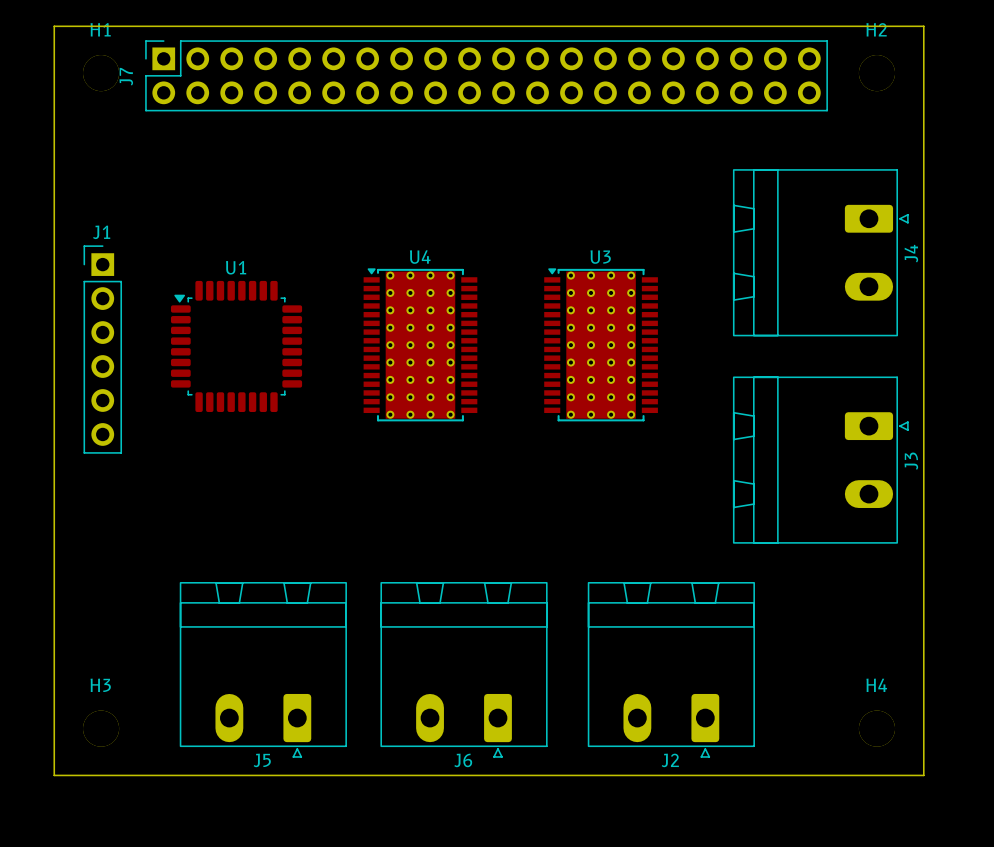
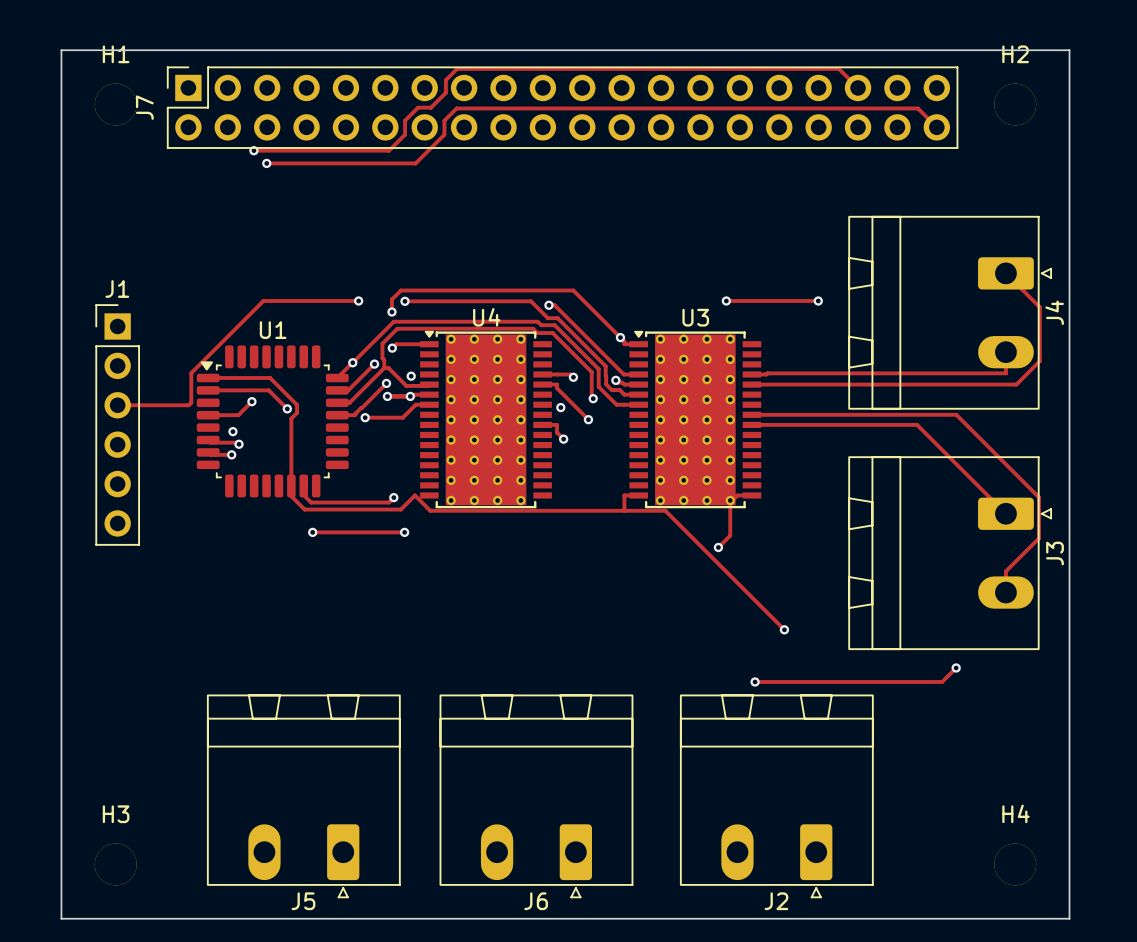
track: none -> (858, 87) (838, 68) (457, 68) (445, 80) (445, 92) (431, 107) (418, 107) (405, 120) (405, 134) (389, 150) (253, 150)
track: none -> (936, 127) (917, 108) (456, 108) (444, 120) (444, 134) (415, 163) (266, 163)
via: none -> (253, 150)
via: none -> (266, 163)
track: none -> (1005, 273) (1039, 307) (1039, 361) (1016, 384) (751, 384)
track: none -> (358, 300) (263, 300) (191, 373) (191, 402) (188, 405) (117, 405)
via: none -> (358, 300)
track: none -> (404, 301) (531, 301) (547, 318) (557, 318) (605, 366) (606, 384) (611, 390) (619, 390) (624, 394) (638, 394)
via: none -> (404, 301)
track: none -> (726, 300) (818, 300)
via: none -> (726, 300)
via: none -> (818, 300)
track: none -> (548, 305) (554, 305) (623, 374) (638, 374)
via: none -> (548, 305)
via: none -> (391, 312)
track: none -> (391, 313) (391, 299) (400, 290) (573, 290) (624, 341) (624, 344) (638, 344)
via: none -> (620, 337)
track: none -> (429, 344) (396, 344) (392, 348)
via: none -> (392, 348)
track: none -> (1005, 352) (1005, 373) (751, 374)
track: none -> (352, 362) (337, 377)
track: none -> (352, 362) (393, 321) (537, 321) (541, 325) (554, 325) (598, 369) (598, 386) (616, 404) (638, 404)
via: none -> (352, 362)
track: none -> (374, 364) (348, 390) (337, 390)
via: none -> (374, 364)
track: none -> (384, 368) (382, 343) (397, 328) (533, 328) (537, 333) (552, 333) (591, 372) (593, 398)
track: none -> (384, 368) (349, 402) (337, 402)
track: none -> (384, 368) (388, 368) (406, 385) (429, 384)
track: none -> (542, 374) (570, 374) (573, 377)
via: none -> (411, 376)
via: none -> (573, 377)
track: none -> (208, 377) (270, 377) (297, 404) (297, 412) (291, 418) (291, 496) (304, 509) (400, 509) (415, 495) (430, 510) (665, 510) (784, 629)
track: none -> (615, 380) (624, 384) (638, 384)
via: none -> (615, 380)
track: none -> (386, 383) (354, 415) (337, 415)
via: none -> (386, 383)
track: none -> (542, 384) (556, 384) (556, 388) (588, 419)
track: none -> (208, 390) (268, 390) (287, 408)
track: none -> (429, 394) (387, 396)
via: none -> (387, 396)
via: none -> (410, 396)
via: none -> (593, 398)
track: none -> (251, 401) (238, 415) (208, 415)
via: none -> (251, 401)
track: none -> (429, 404) (415, 404) (402, 417) (365, 417)
via: none -> (560, 407)
via: none -> (287, 408)
track: none -> (751, 414) (956, 414) (1039, 497) (1039, 538) (1005, 571) (1005, 592)
via: none -> (365, 417)
via: none -> (588, 419)
track: none -> (542, 424) (556, 424) (556, 432) (563, 439)
track: none -> (751, 424) (917, 424) (1005, 513)
via: none -> (232, 431)
via: none -> (563, 439)
track: none -> (208, 440) (210, 442) (237, 442) (239, 444)
via: none -> (239, 444)
track: none -> (208, 452) (210, 454) (231, 454)
via: none -> (231, 454)
track: none -> (303, 485) (303, 495) (311, 502) (388, 502) (393, 497)
track: none -> (638, 495) (624, 495) (624, 510)
track: none -> (751, 495) (737, 495) (730, 500) (730, 535) (718, 547)
via: none -> (393, 497)
track: none -> (312, 532) (404, 532)
via: none -> (312, 532)
via: none -> (404, 532)
via: none -> (718, 547)
via: none -> (784, 629)
track: none -> (956, 667) (942, 681) (755, 681)
via: none -> (956, 667)
via: none -> (755, 681)

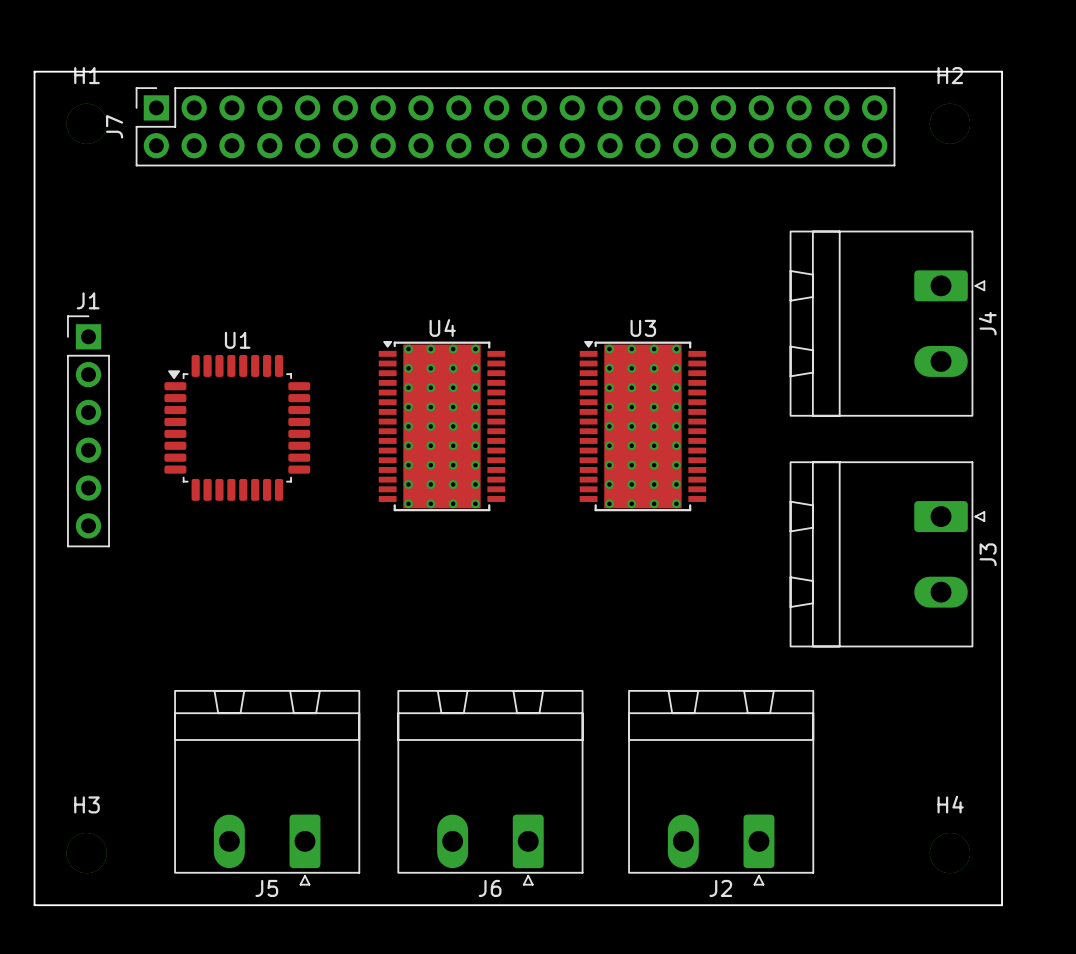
track: (858, 87) (838, 68) (457, 68) (445, 80) (445, 92) (431, 107) (418, 107) (405, 120) (405, 134) (389, 150) (253, 150) -> none
track: (936, 127) (917, 108) (456, 108) (444, 120) (444, 134) (415, 163) (266, 163) -> none
via: (253, 150) -> none
via: (266, 163) -> none
track: (1005, 273) (1039, 307) (1039, 361) (1016, 384) (751, 384) -> none
track: (358, 300) (263, 300) (191, 373) (191, 402) (188, 405) (117, 405) -> none
via: (358, 300) -> none
track: (726, 300) (818, 300) -> none
via: (726, 300) -> none
via: (818, 300) -> none
track: (404, 301) (531, 301) (547, 318) (557, 318) (605, 366) (606, 384) (611, 390) (619, 390) (624, 394) (638, 394) -> none
via: (404, 301) -> none
track: (548, 305) (554, 305) (623, 374) (638, 374) -> none
via: (548, 305) -> none
via: (391, 312) -> none
track: (391, 313) (391, 299) (400, 290) (573, 290) (624, 341) (624, 344) (638, 344) -> none
via: (620, 337) -> none
track: (429, 344) (396, 344) (392, 348) -> none
via: (392, 348) -> none
track: (1005, 352) (1005, 373) (751, 374) -> none
track: (352, 362) (337, 377) -> none
track: (352, 362) (393, 321) (537, 321) (541, 325) (554, 325) (598, 369) (598, 386) (616, 404) (638, 404) -> none
via: (352, 362) -> none
track: (374, 364) (348, 390) (337, 390) -> none
via: (374, 364) -> none
track: (384, 368) (382, 343) (397, 328) (533, 328) (537, 333) (552, 333) (591, 372) (593, 398) -> none
track: (384, 368) (349, 402) (337, 402) -> none
track: (384, 368) (388, 368) (406, 385) (429, 384) -> none
track: (542, 374) (570, 374) (573, 377) -> none
via: (411, 376) -> none
track: (208, 377) (270, 377) (297, 404) (297, 412) (291, 418) (291, 496) (304, 509) (400, 509) (415, 495) (430, 510) (665, 510) (784, 629) -> none
via: (573, 377) -> none
track: (615, 380) (624, 384) (638, 384) -> none
via: (615, 380) -> none
track: (386, 383) (354, 415) (337, 415) -> none
via: (386, 383) -> none
track: (542, 384) (556, 384) (556, 388) (588, 419) -> none
track: (208, 390) (268, 390) (287, 408) -> none
track: (429, 394) (387, 396) -> none
via: (387, 396) -> none
via: (410, 396) -> none
via: (593, 398) -> none
track: (251, 401) (238, 415) (208, 415) -> none
via: (251, 401) -> none
track: (429, 404) (415, 404) (402, 417) (365, 417) -> none
via: (560, 407) -> none
via: (287, 408) -> none
track: (751, 414) (956, 414) (1039, 497) (1039, 538) (1005, 571) (1005, 592) -> none
via: (365, 417) -> none
via: (588, 419) -> none
track: (542, 424) (556, 424) (556, 432) (563, 439) -> none
track: (751, 424) (917, 424) (1005, 513) -> none
via: (232, 431) -> none
via: (563, 439) -> none
track: (208, 440) (210, 442) (237, 442) (239, 444) -> none
via: (239, 444) -> none
track: (208, 452) (210, 454) (231, 454) -> none
via: (231, 454) -> none
track: (303, 485) (303, 495) (311, 502) (388, 502) (393, 497) -> none
track: (638, 495) (624, 495) (624, 510) -> none
track: (751, 495) (737, 495) (730, 500) (730, 535) (718, 547) -> none
via: (393, 497) -> none
track: (312, 532) (404, 532) -> none
via: (312, 532) -> none
via: (404, 532) -> none
via: (718, 547) -> none
via: (784, 629) -> none
track: (956, 667) (942, 681) (755, 681) -> none
via: (956, 667) -> none
via: (755, 681) -> none

